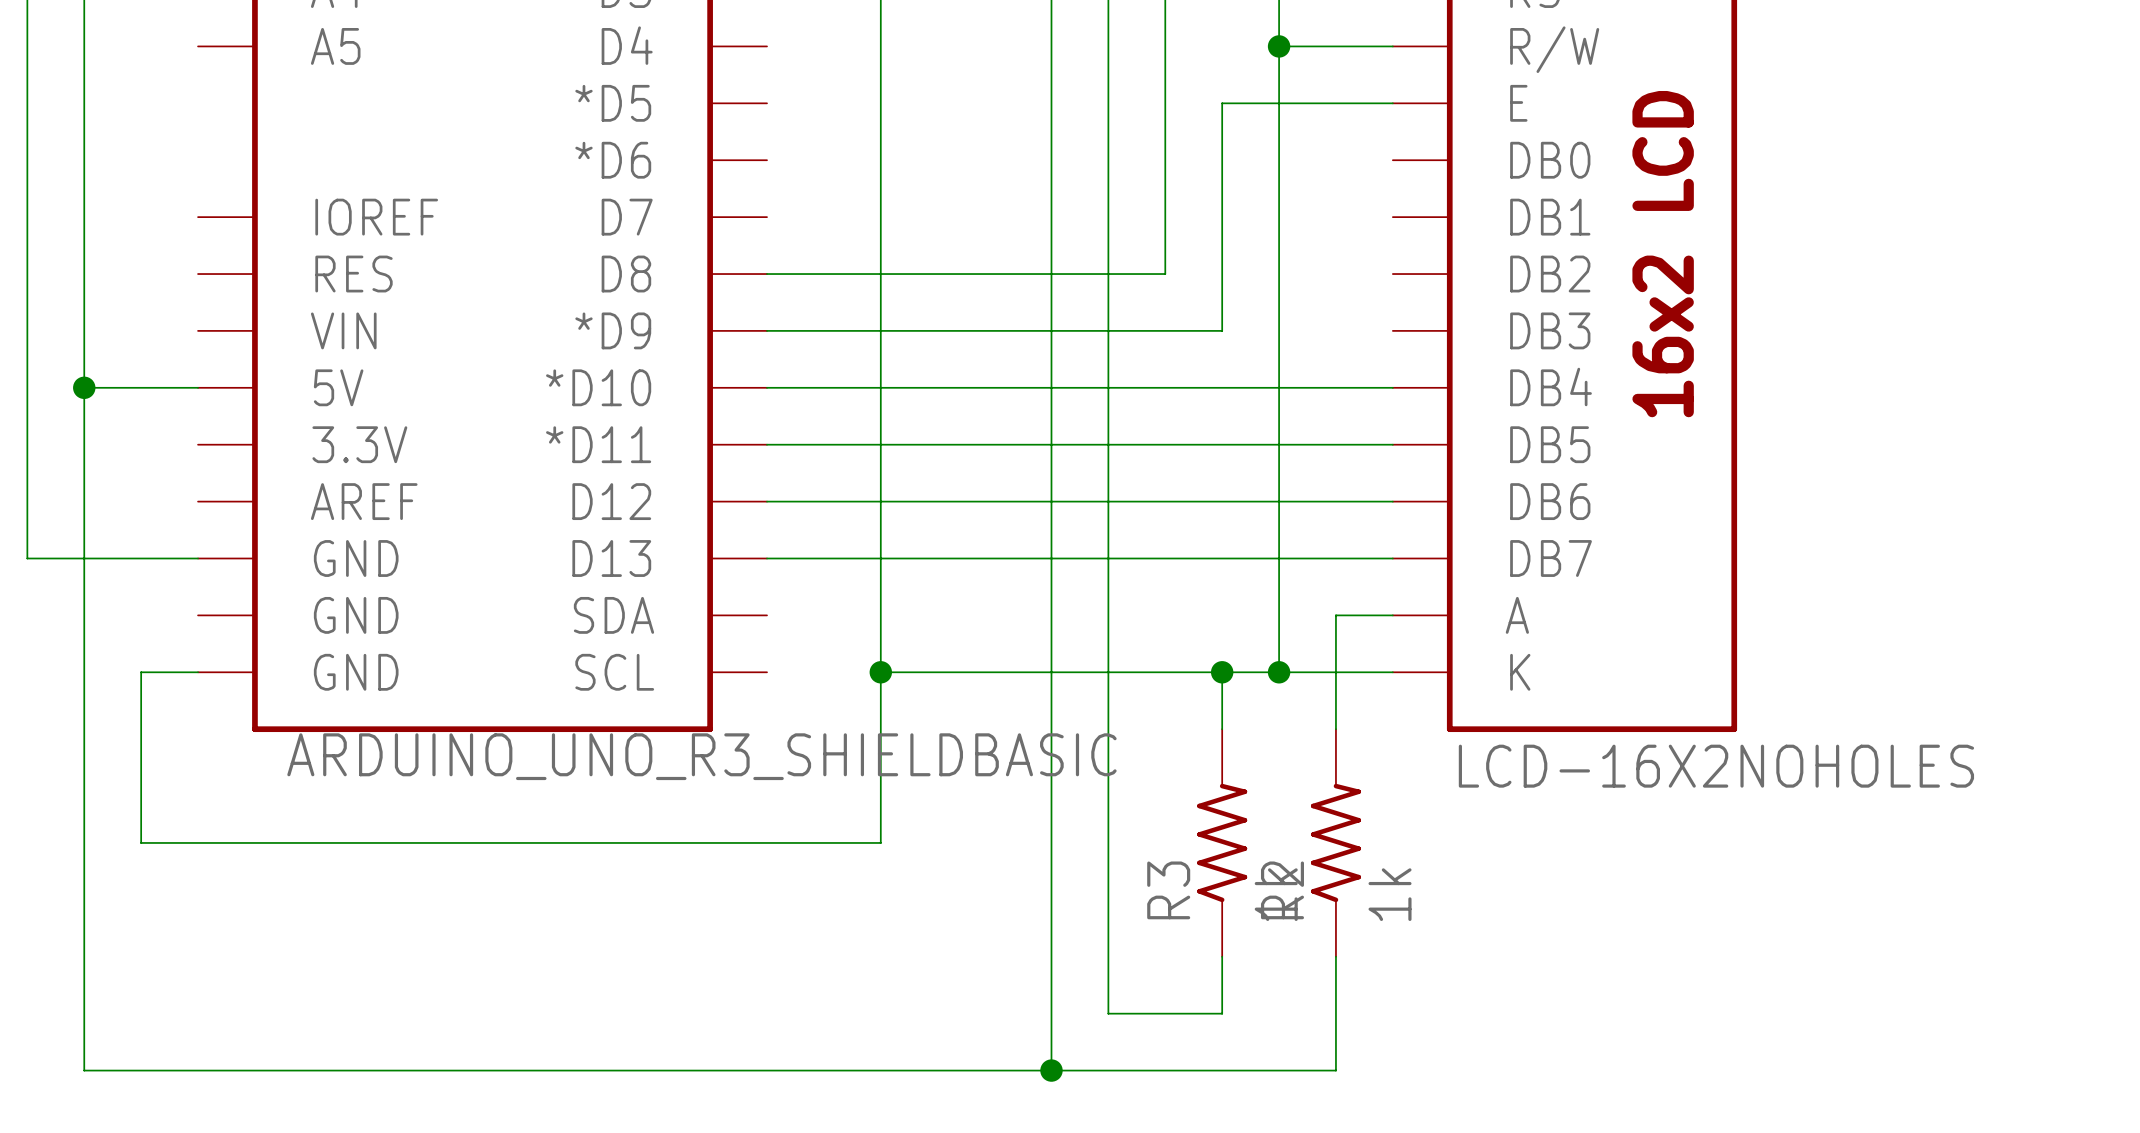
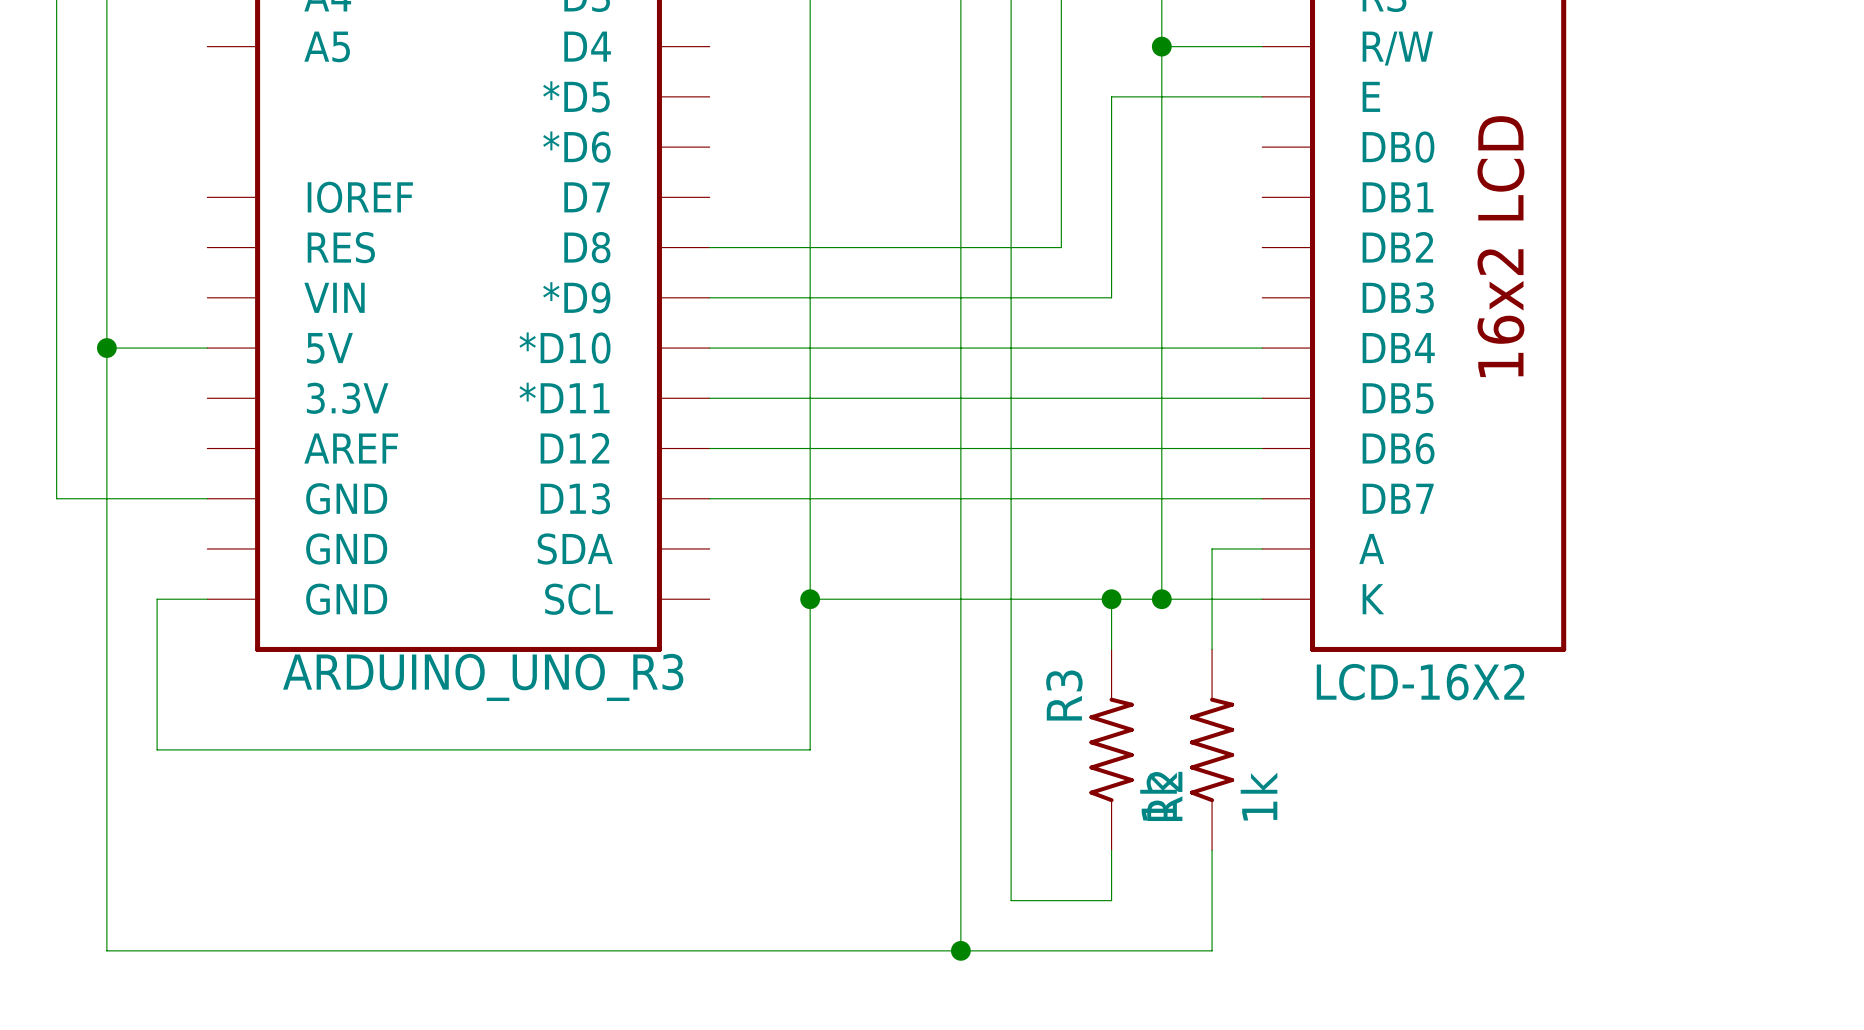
part value: ARDUINO_UNO_R3_SHIELDBASIC (701, 756) -> ARDUINO_UNO_R3 (483, 677)
part value: LCD-16X2NOHOLES (1716, 766) -> LCD-16X2 (1420, 682)
R3 name position: R3 (1168, 890) -> R3 (1064, 695)

